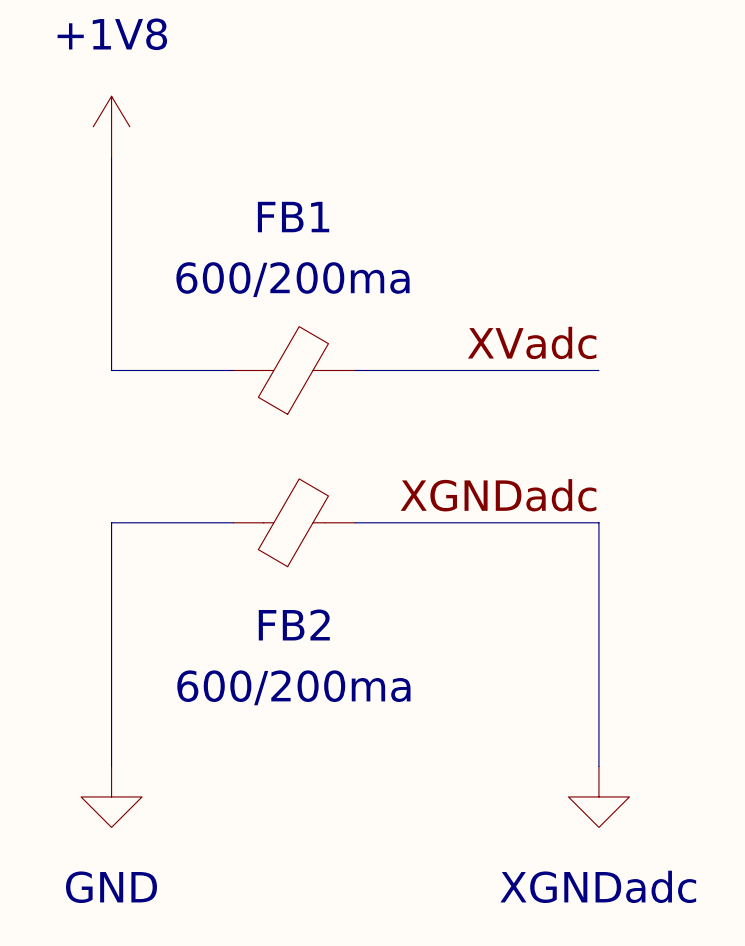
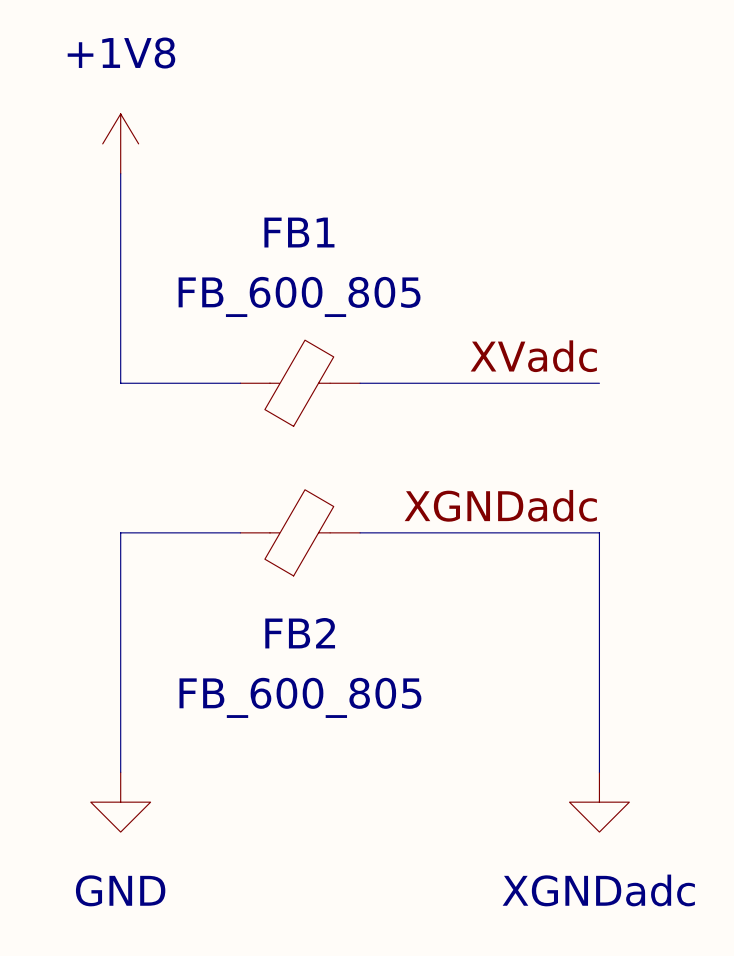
FB1 value: 600/200ma (292, 279) -> FB_600_805 (299, 296)
FB2 value: 600/200ma (293, 687) -> FB_600_805 (300, 697)

